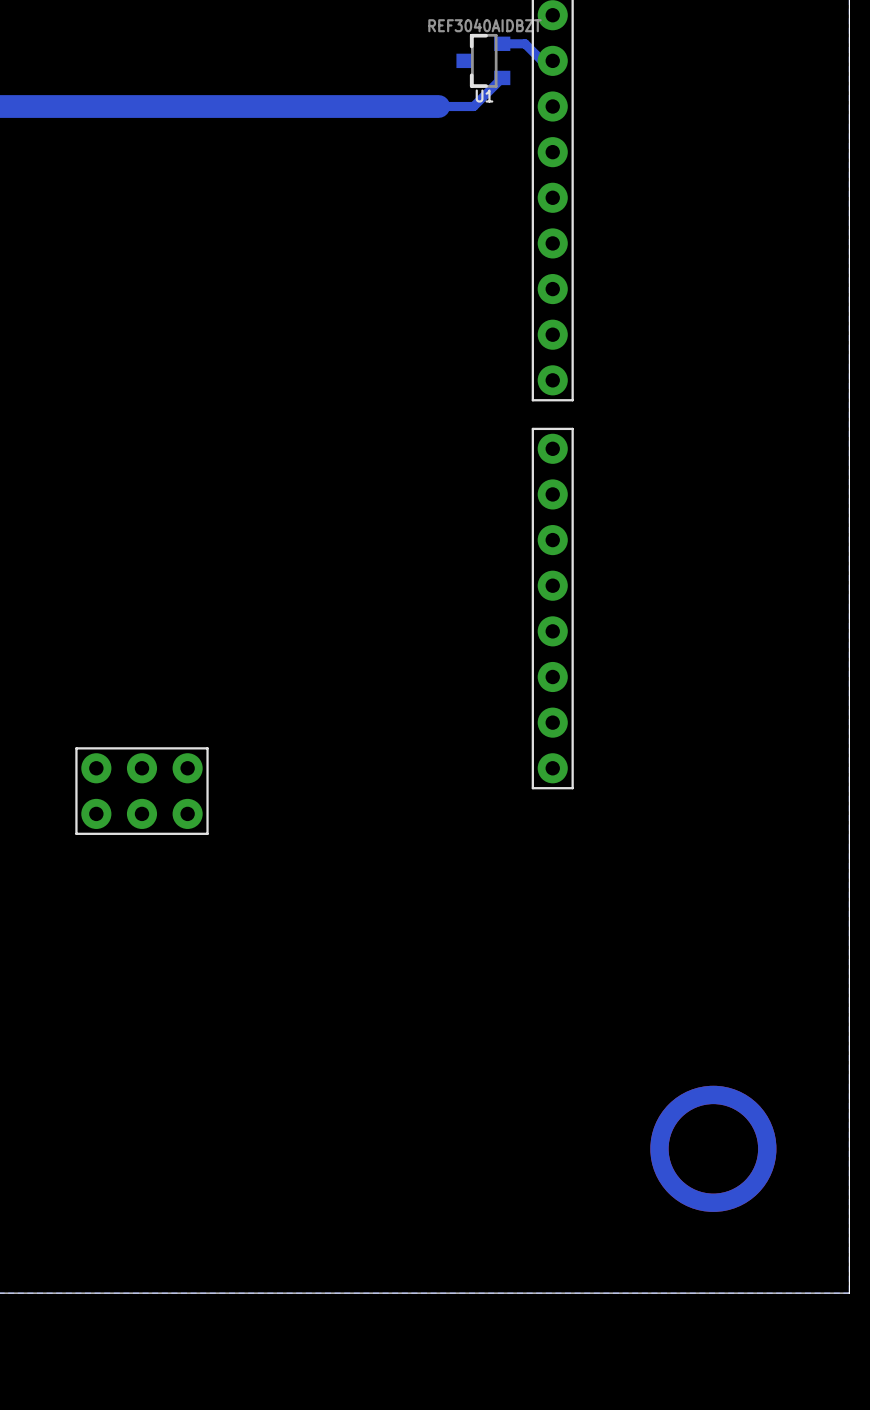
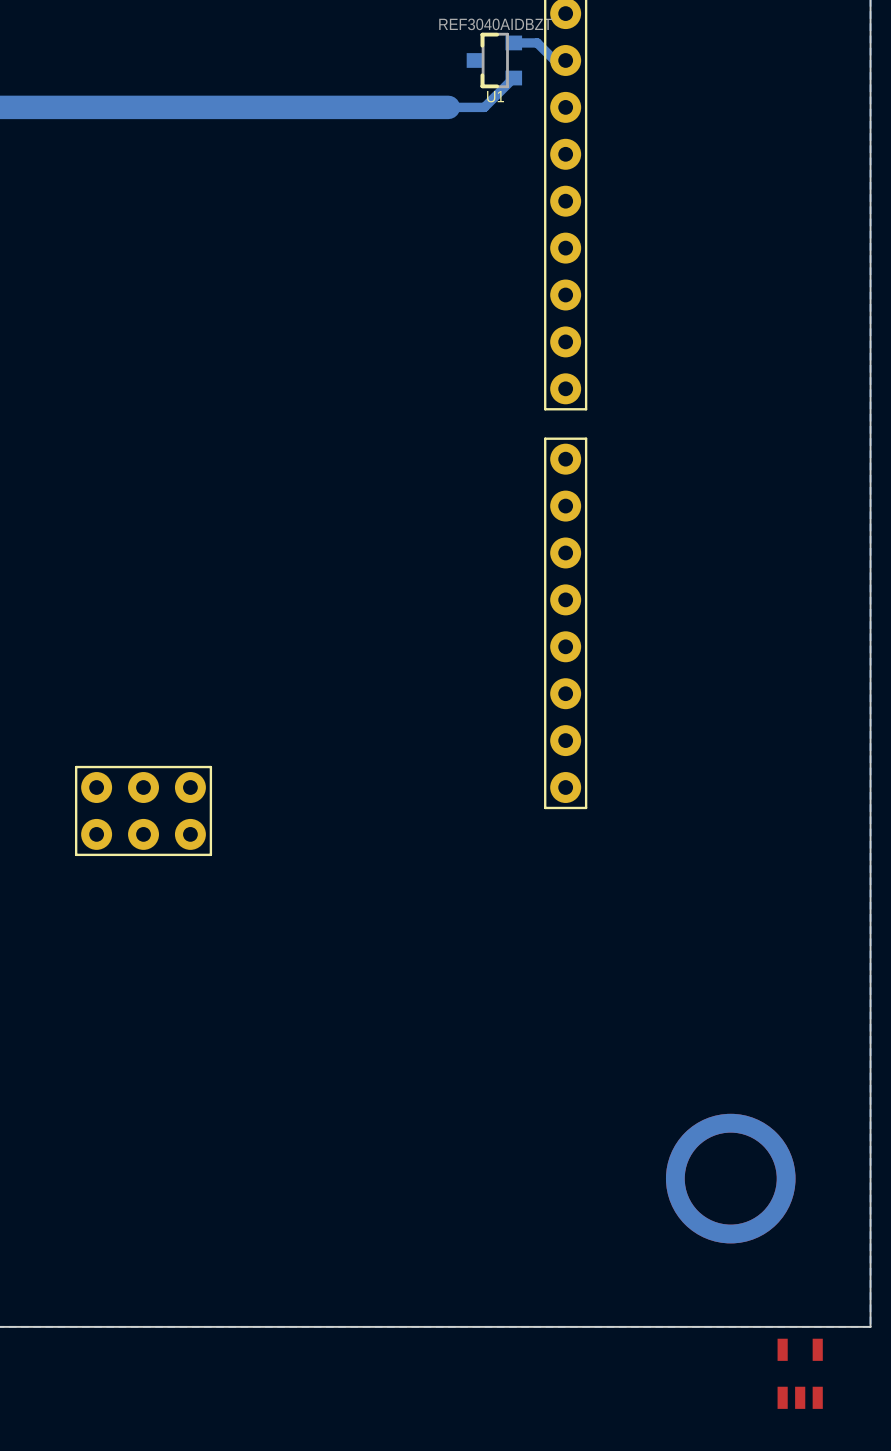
part: none -> (800, 1373)

